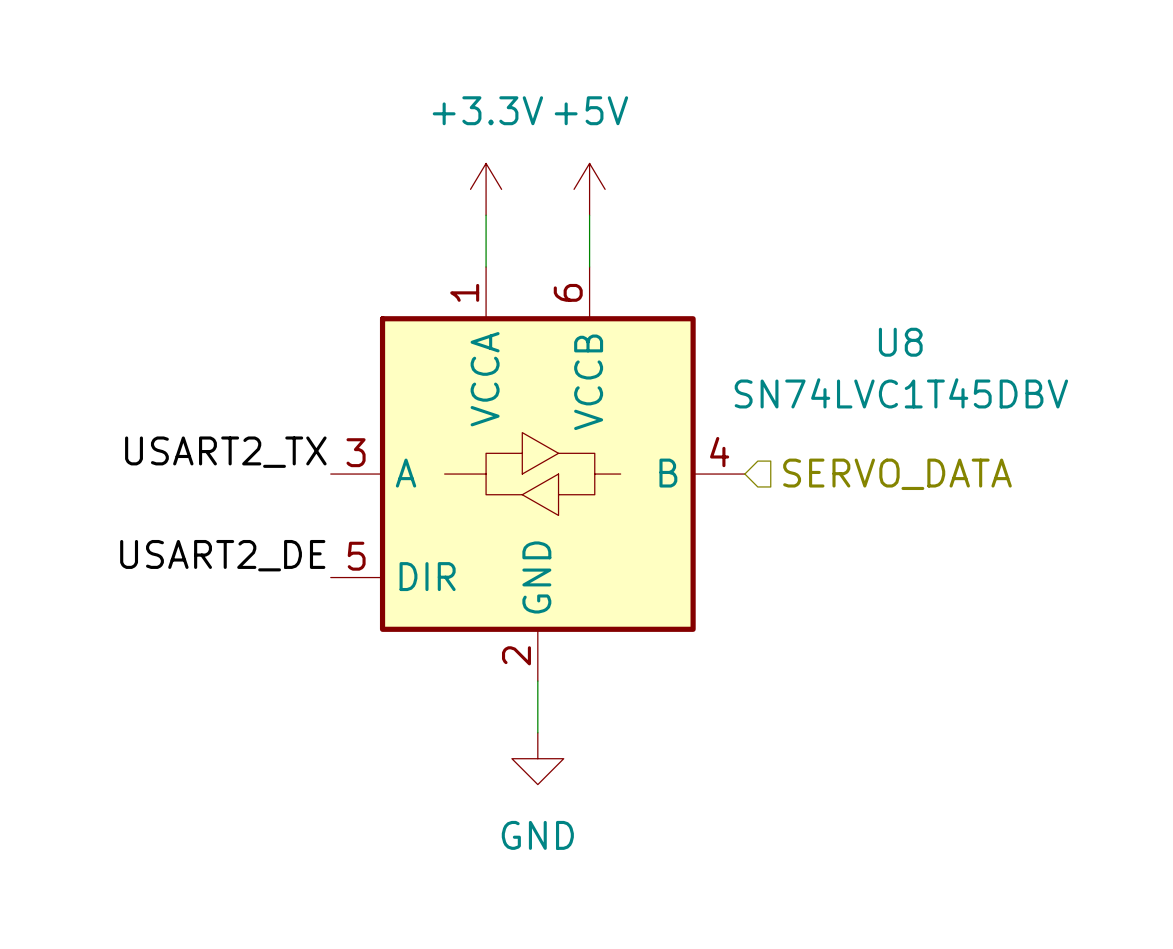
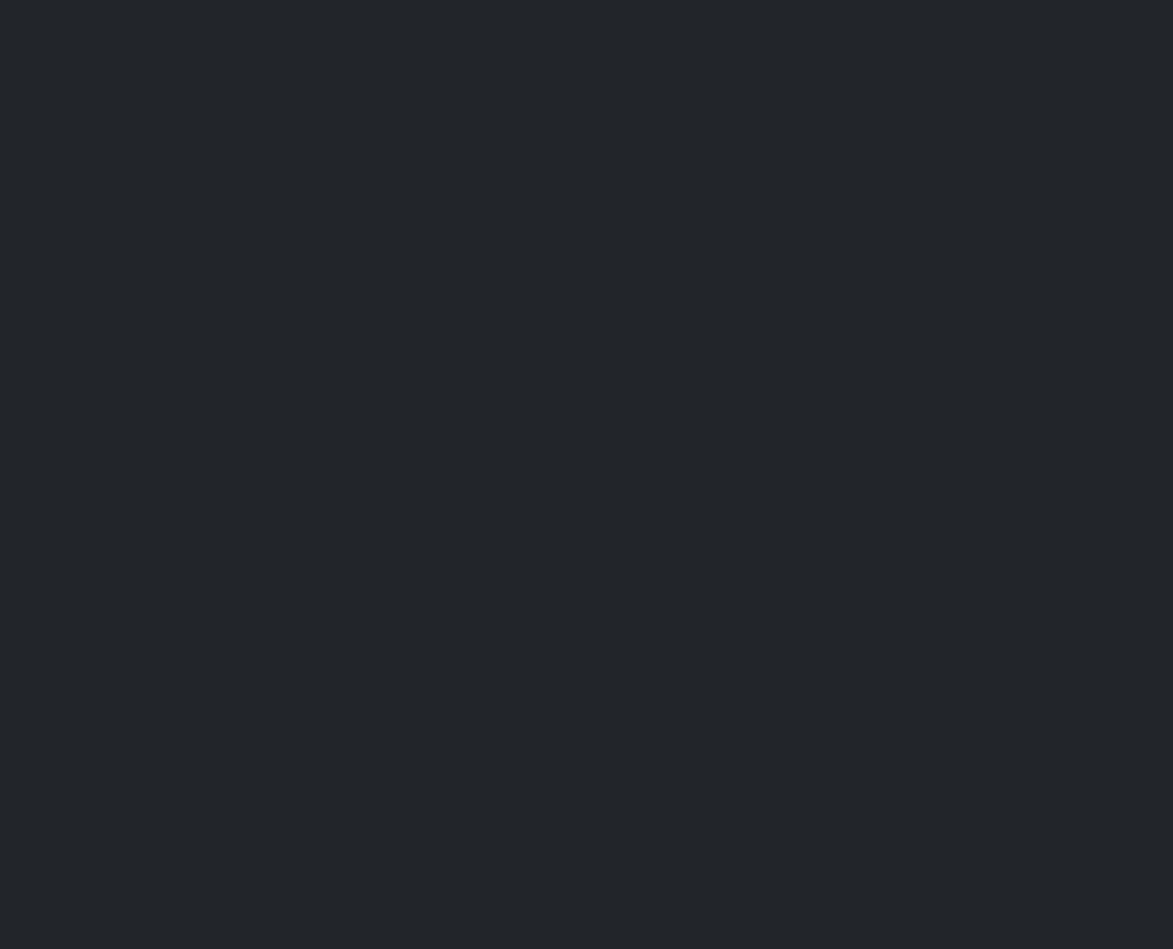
power symbol: +3.3V (486, 189) -> none
power symbol: +5V (589, 189) -> none
wire: (486, 215) (486, 266) -> none
wire: (589, 215) (589, 266) -> none
label: USART2_TX (225, 452) -> none
U8: SN74LVC1T45DBV (537, 474) -> none
hierarchical label: SERVO_DATA (897, 474) -> none
label: USART2_DE (222, 555) -> none
wire: (537, 681) (537, 732) -> none
power symbol: GND (537, 758) -> none

